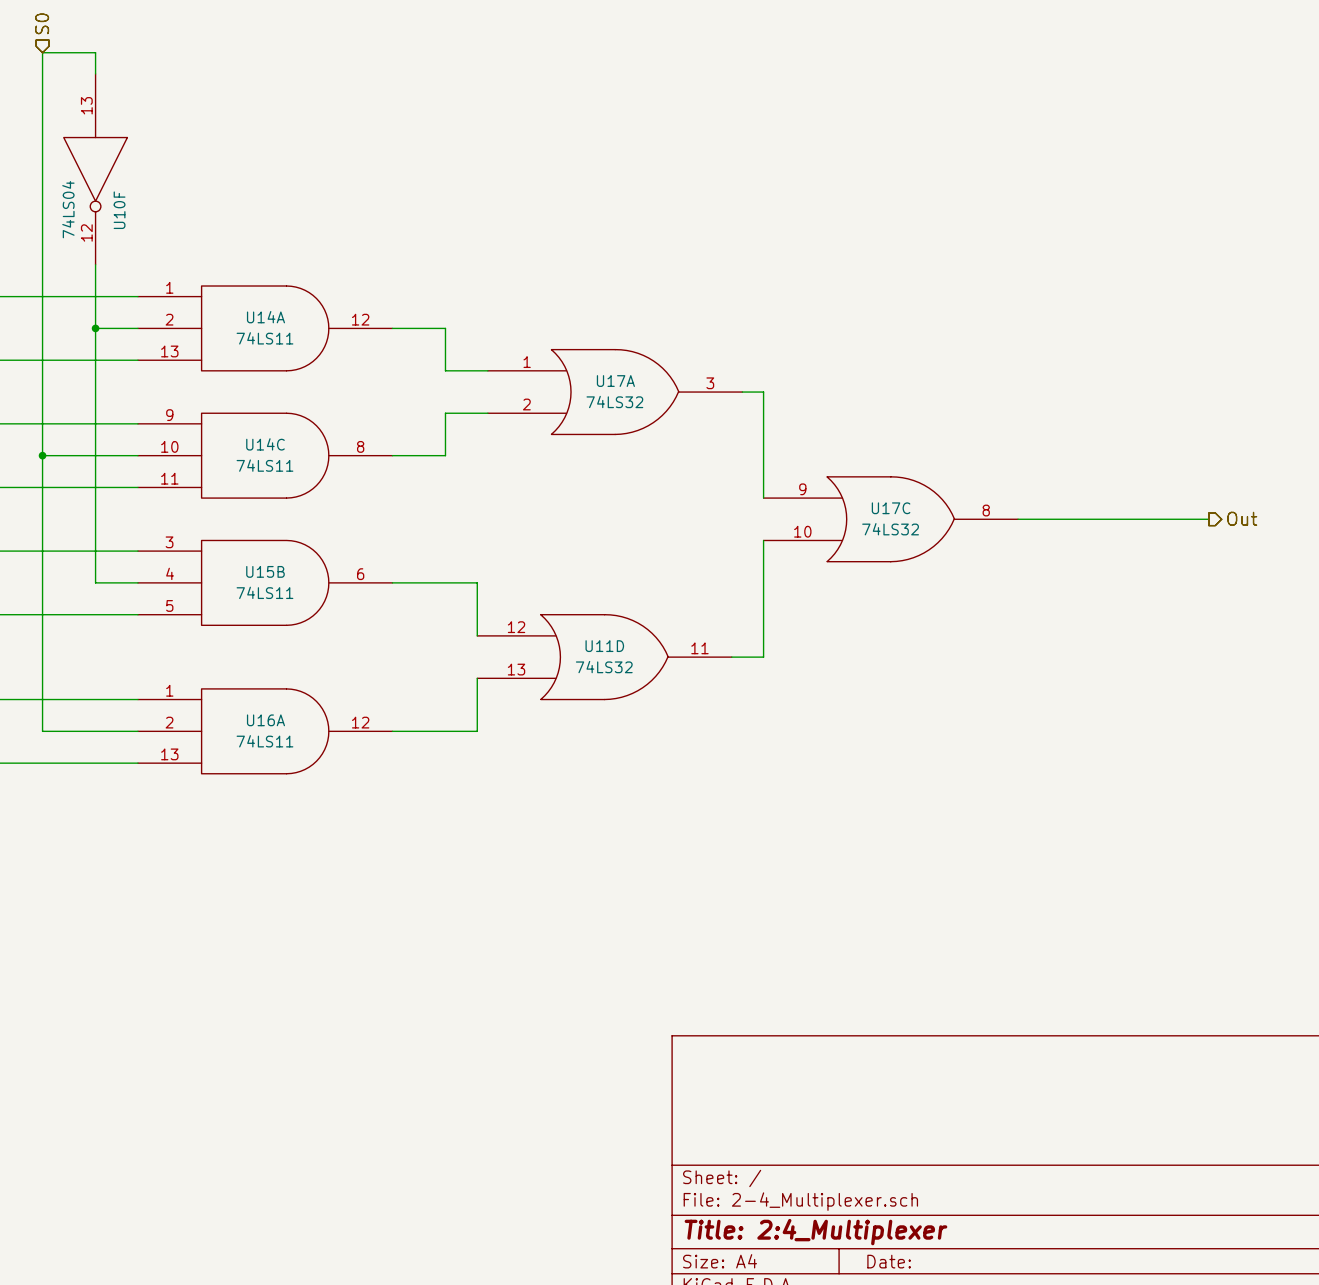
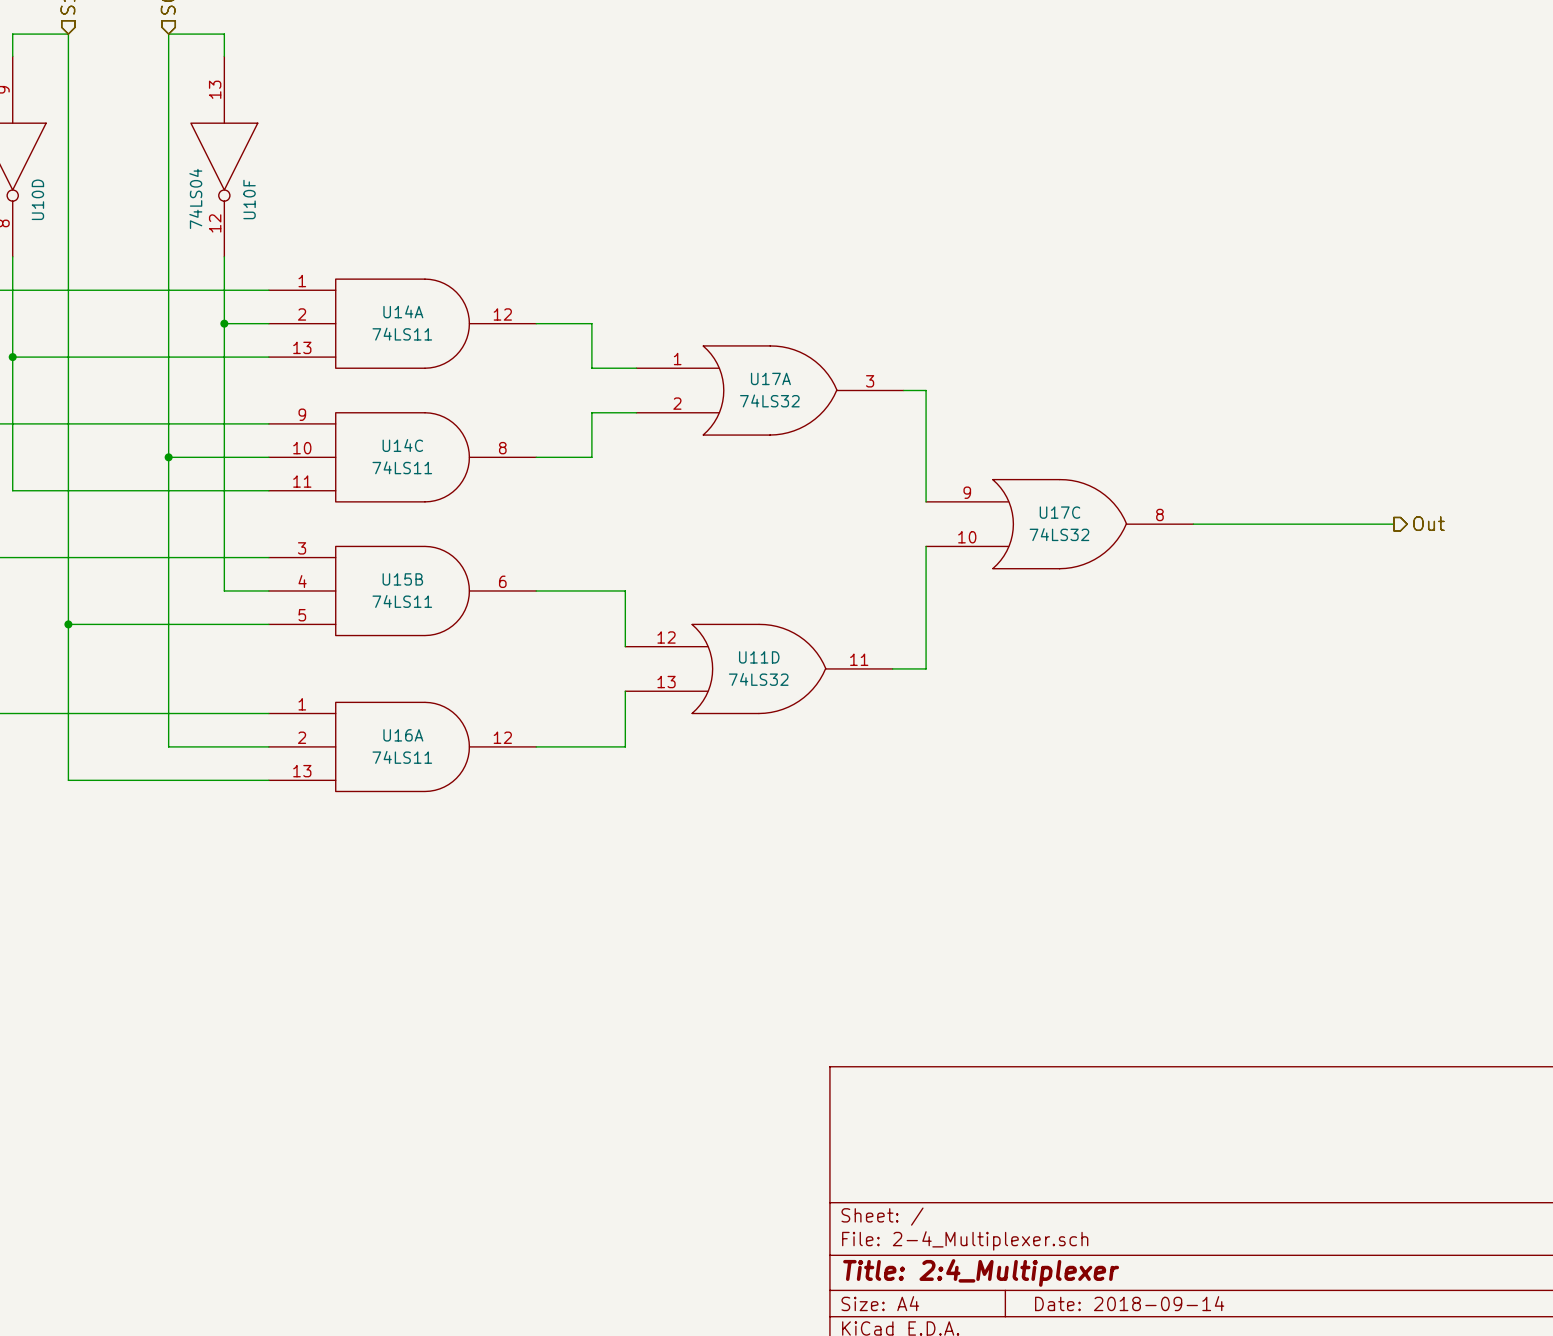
title block: Date: (889, 1261) -> Date: 2018-09-14 (1129, 1303)

